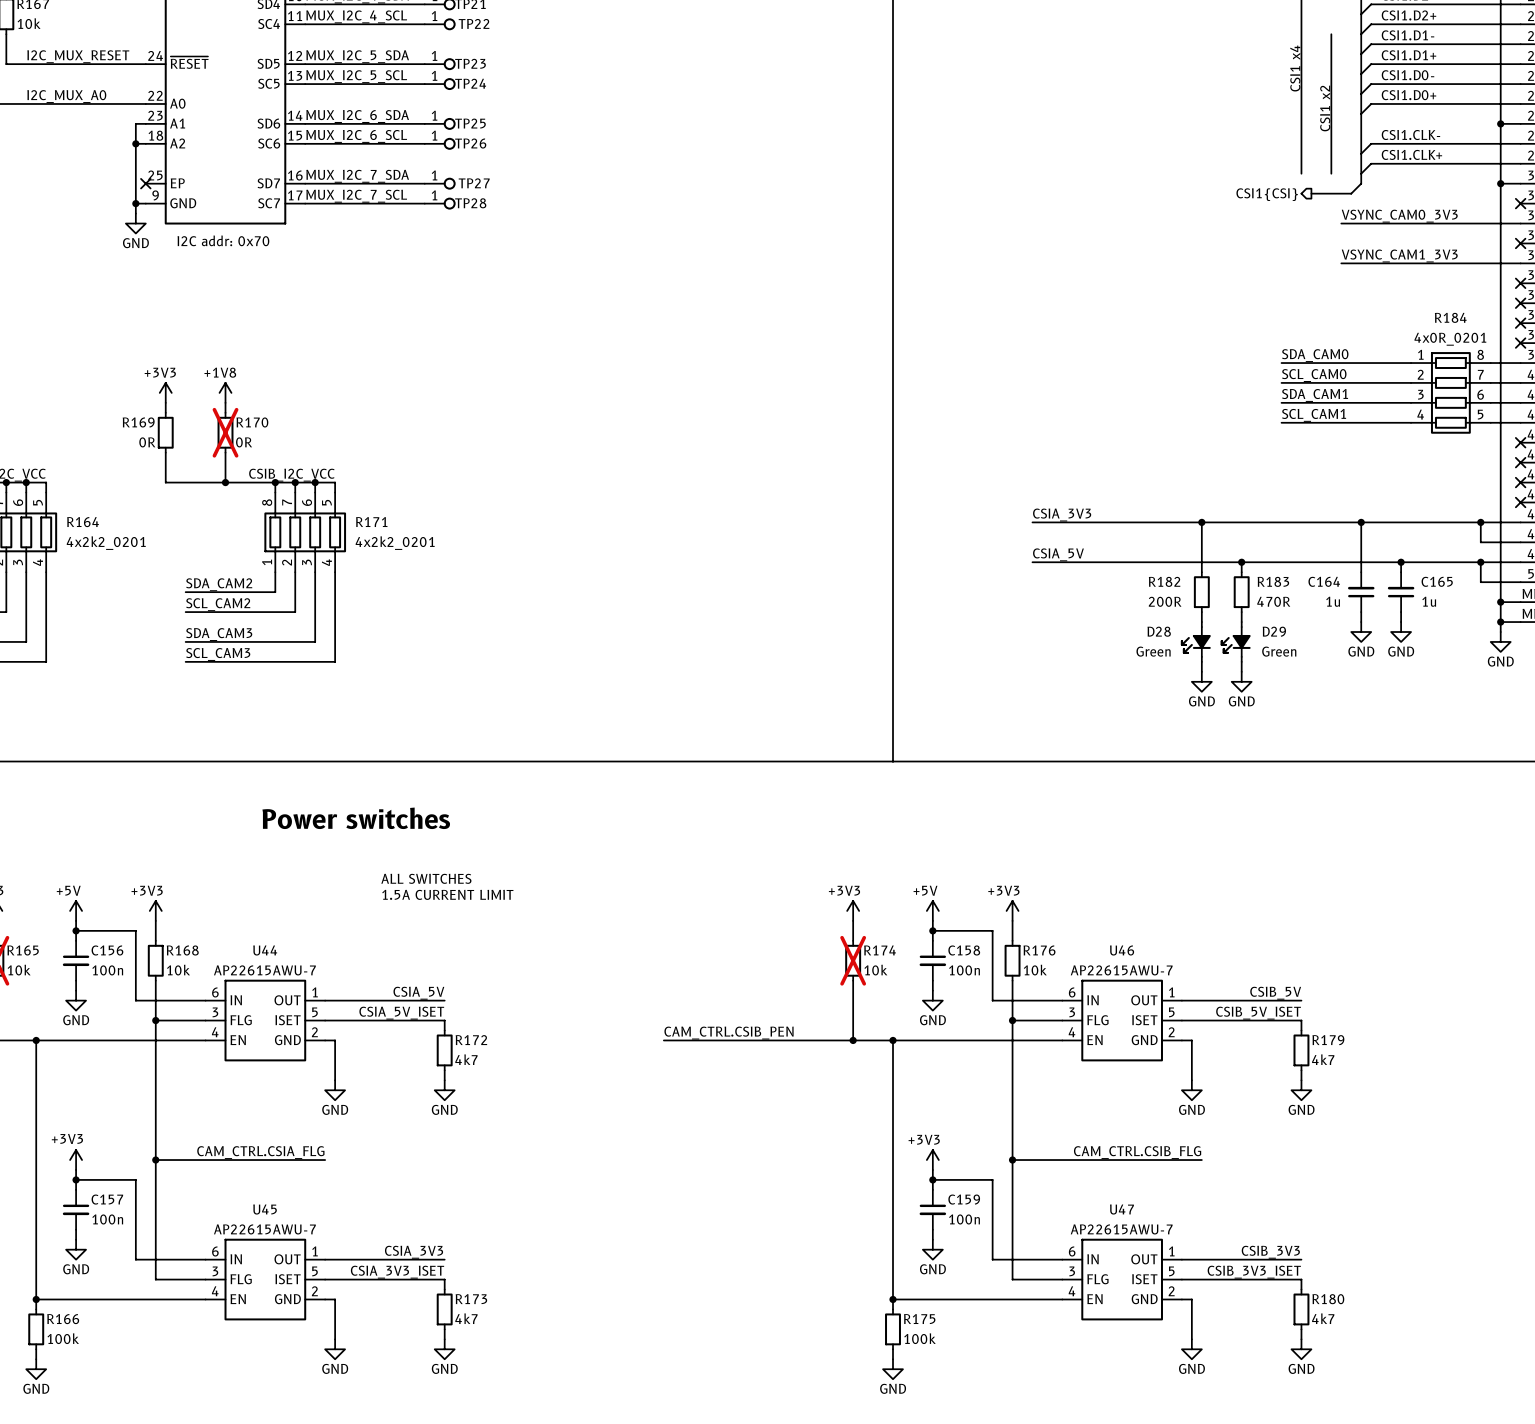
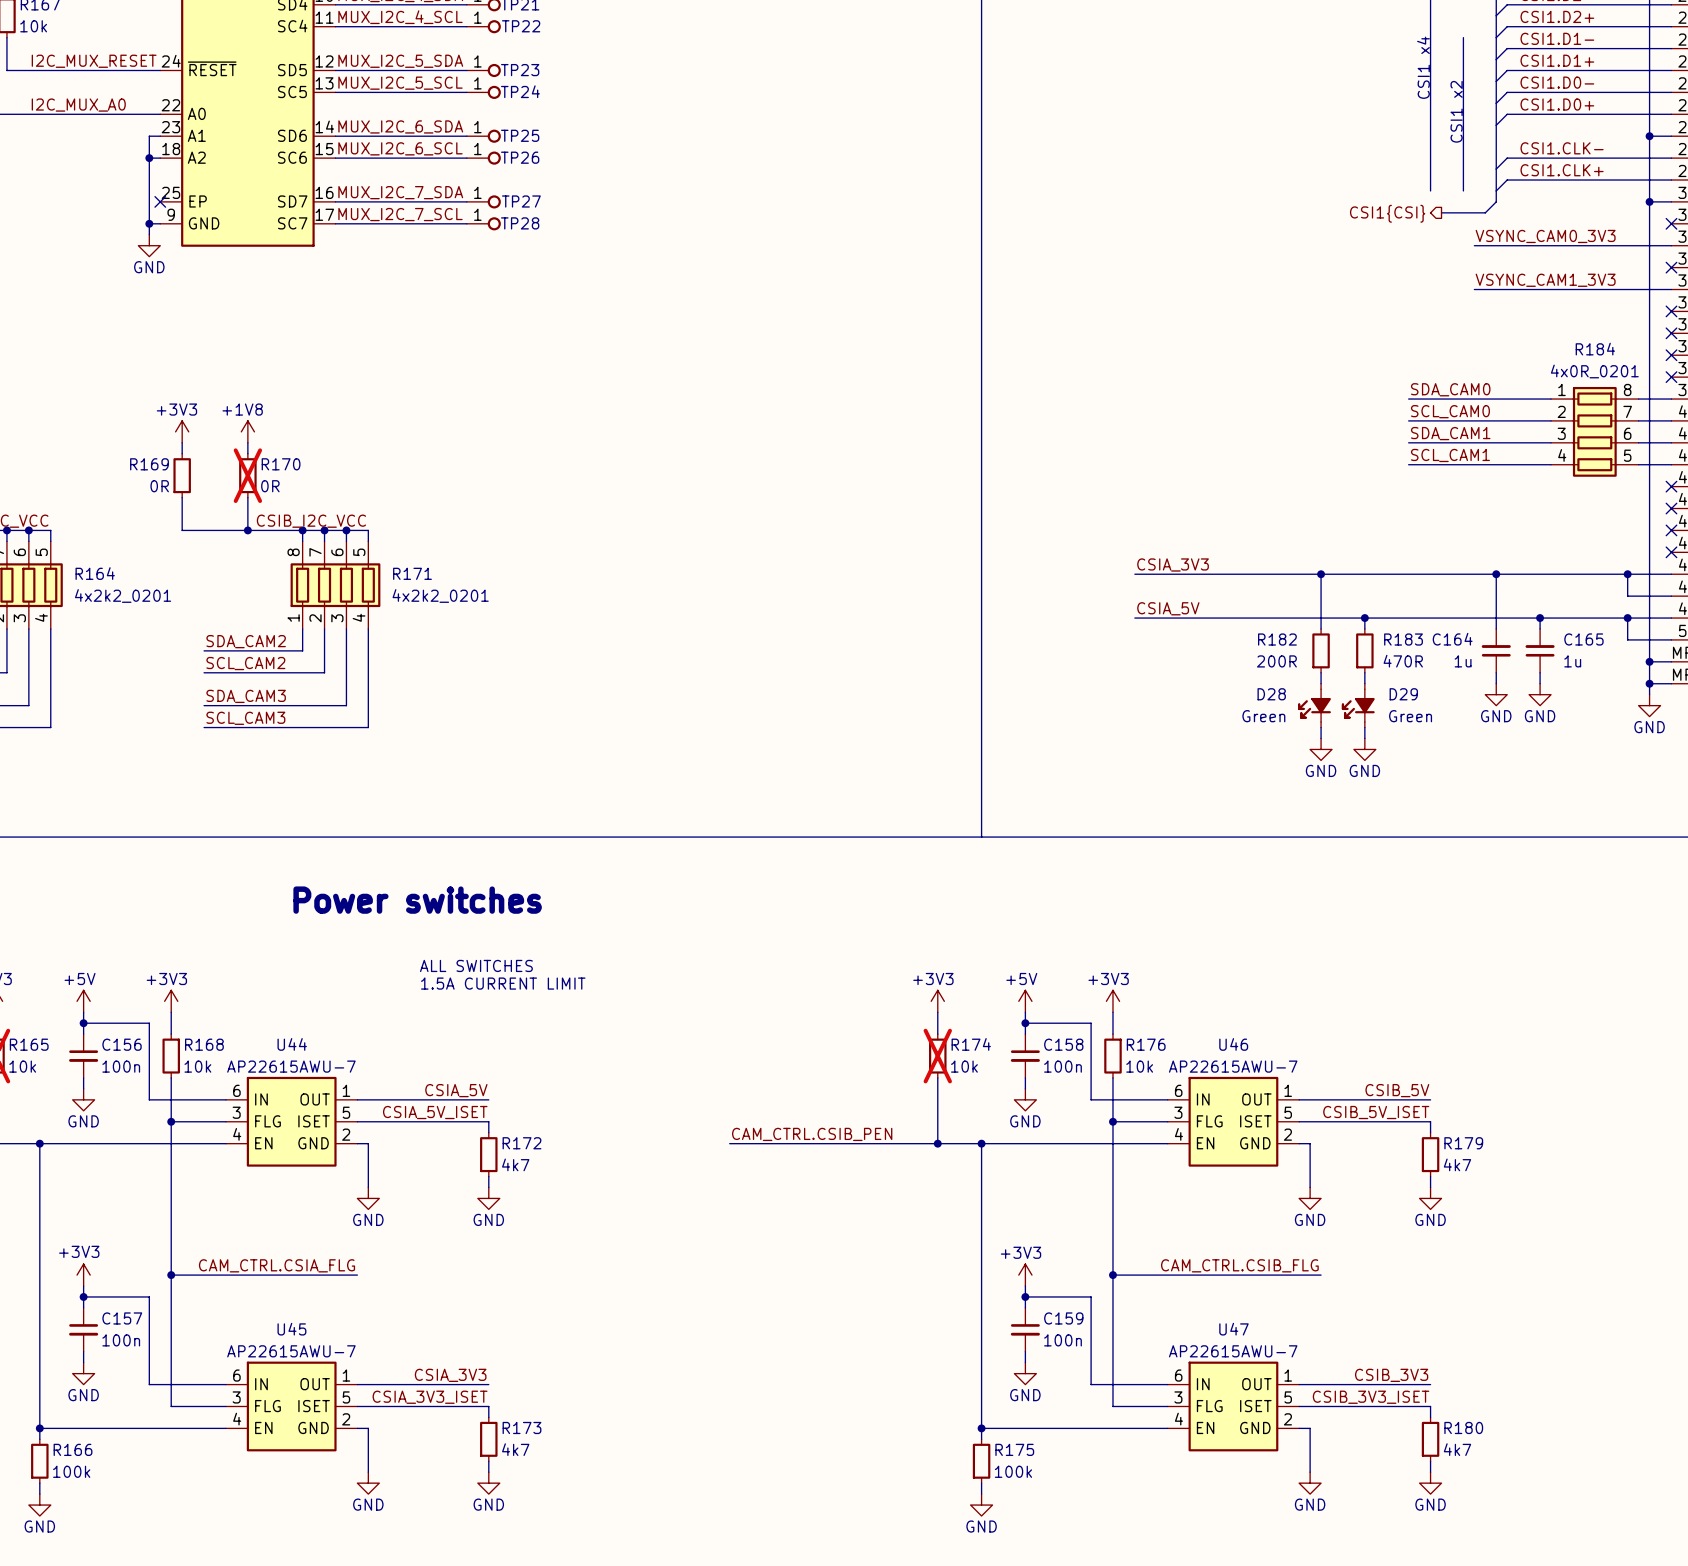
text: I2C addr: 0x70 (223, 240) -> none

